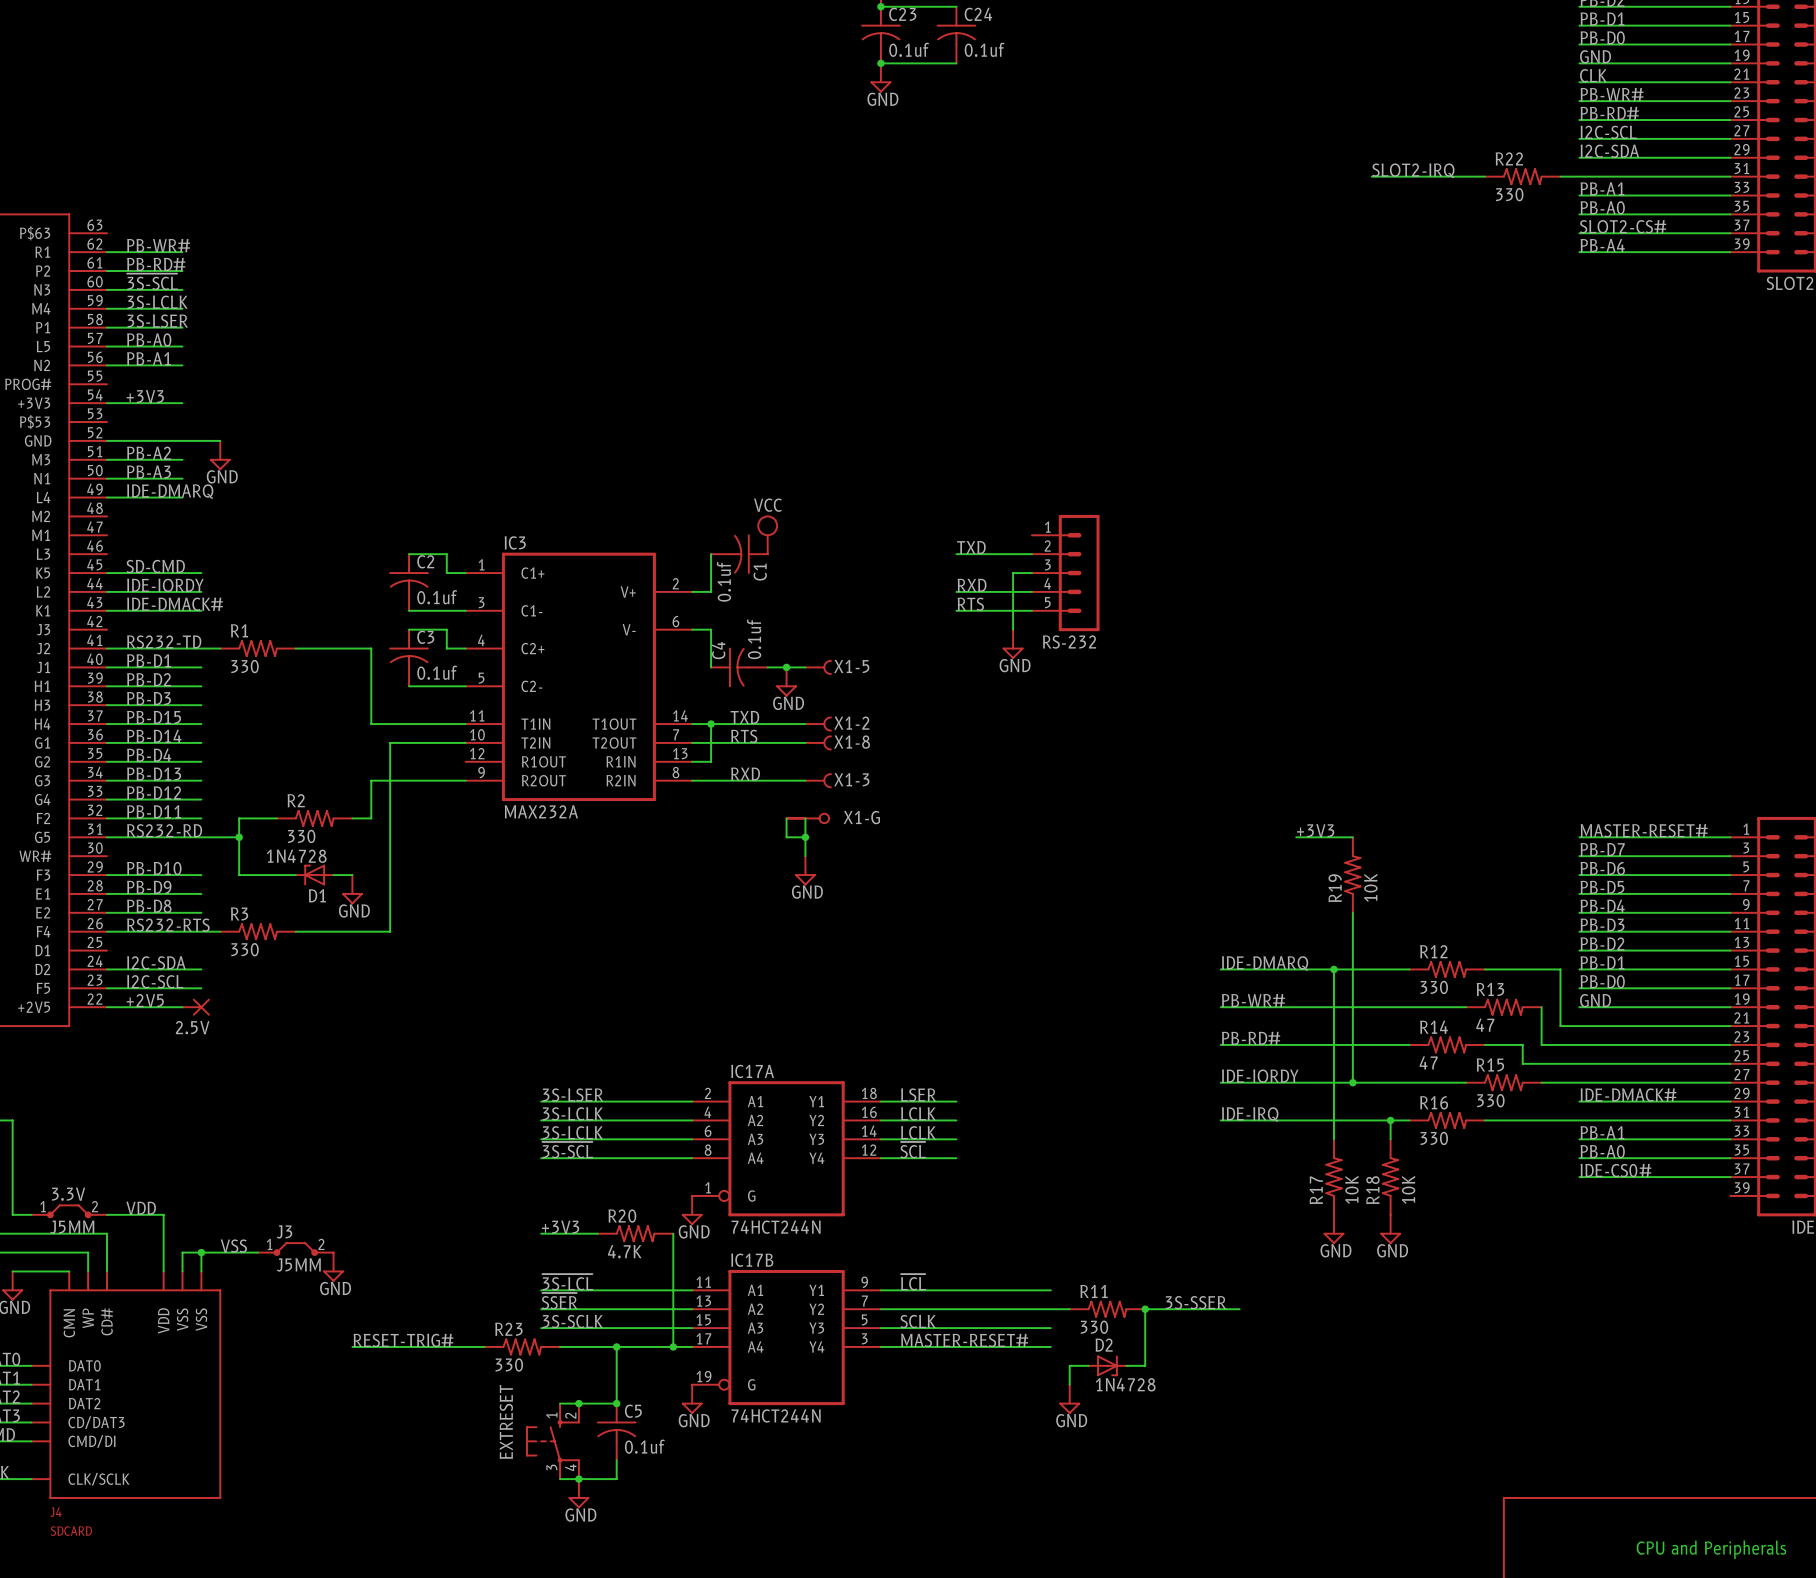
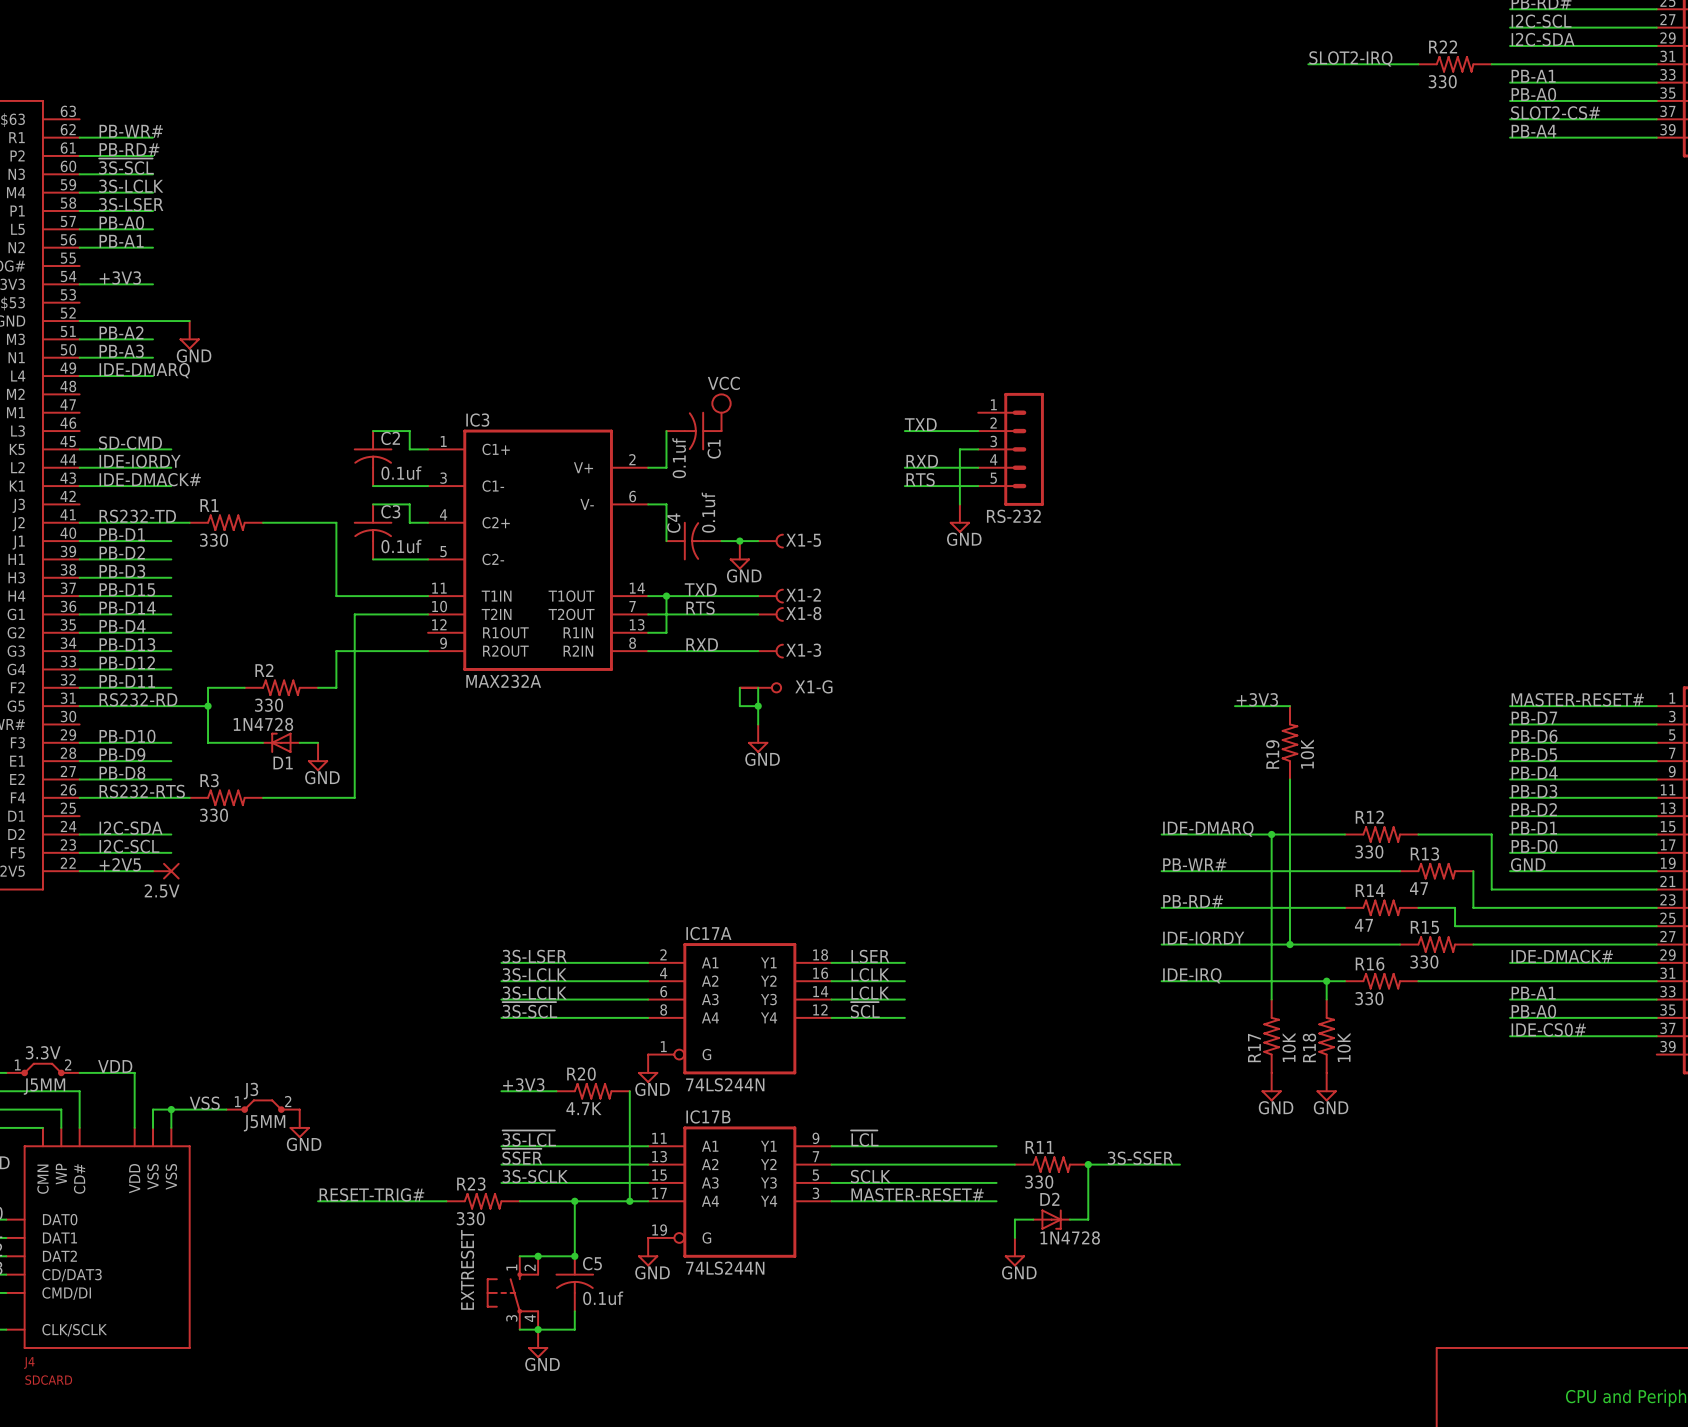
IC17A value: 74HCT244N (776, 1227) -> 74LS244N (725, 1084)
IC17B value: 74HCT244N (776, 1415) -> 74LS244N (725, 1268)

